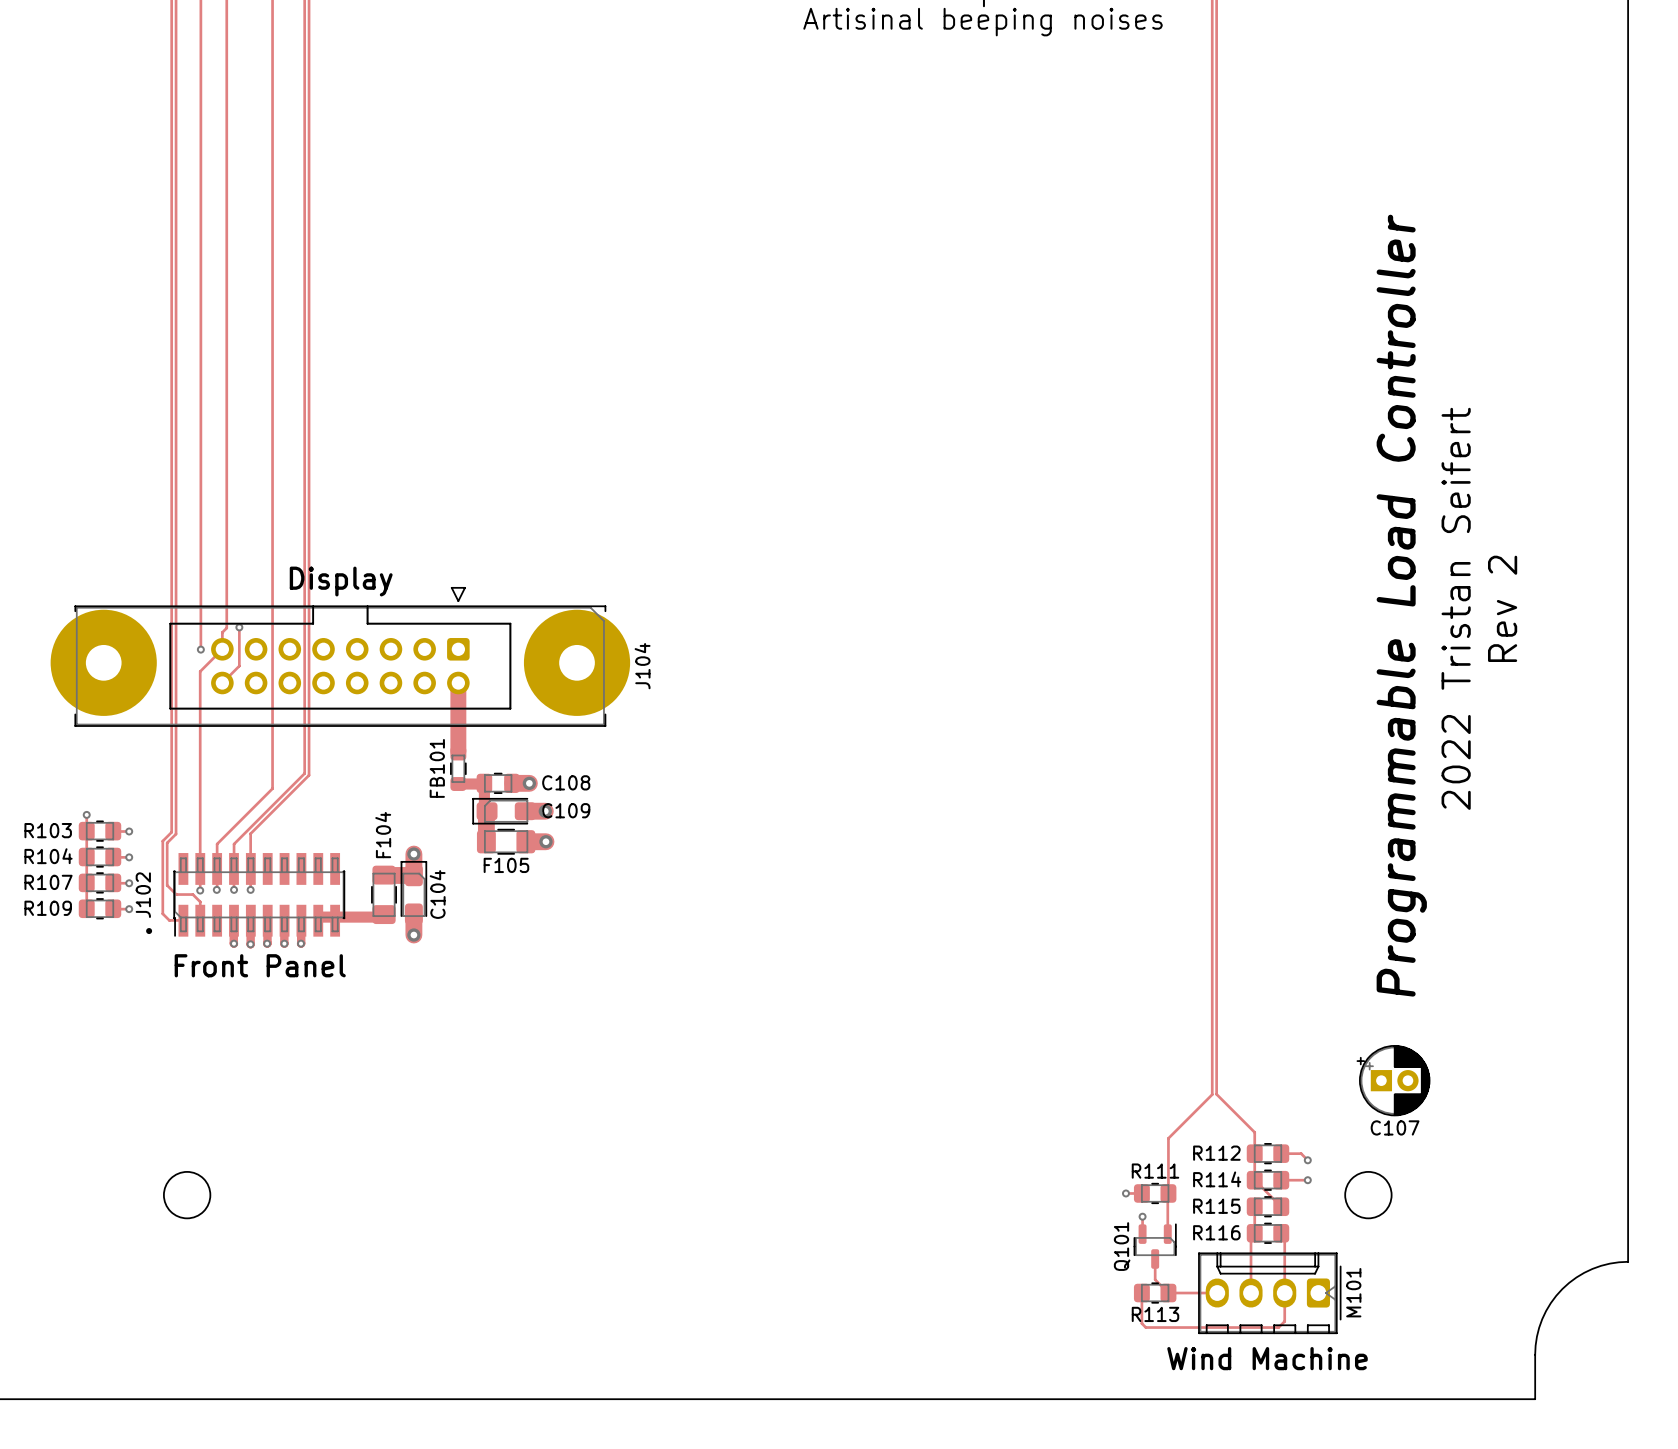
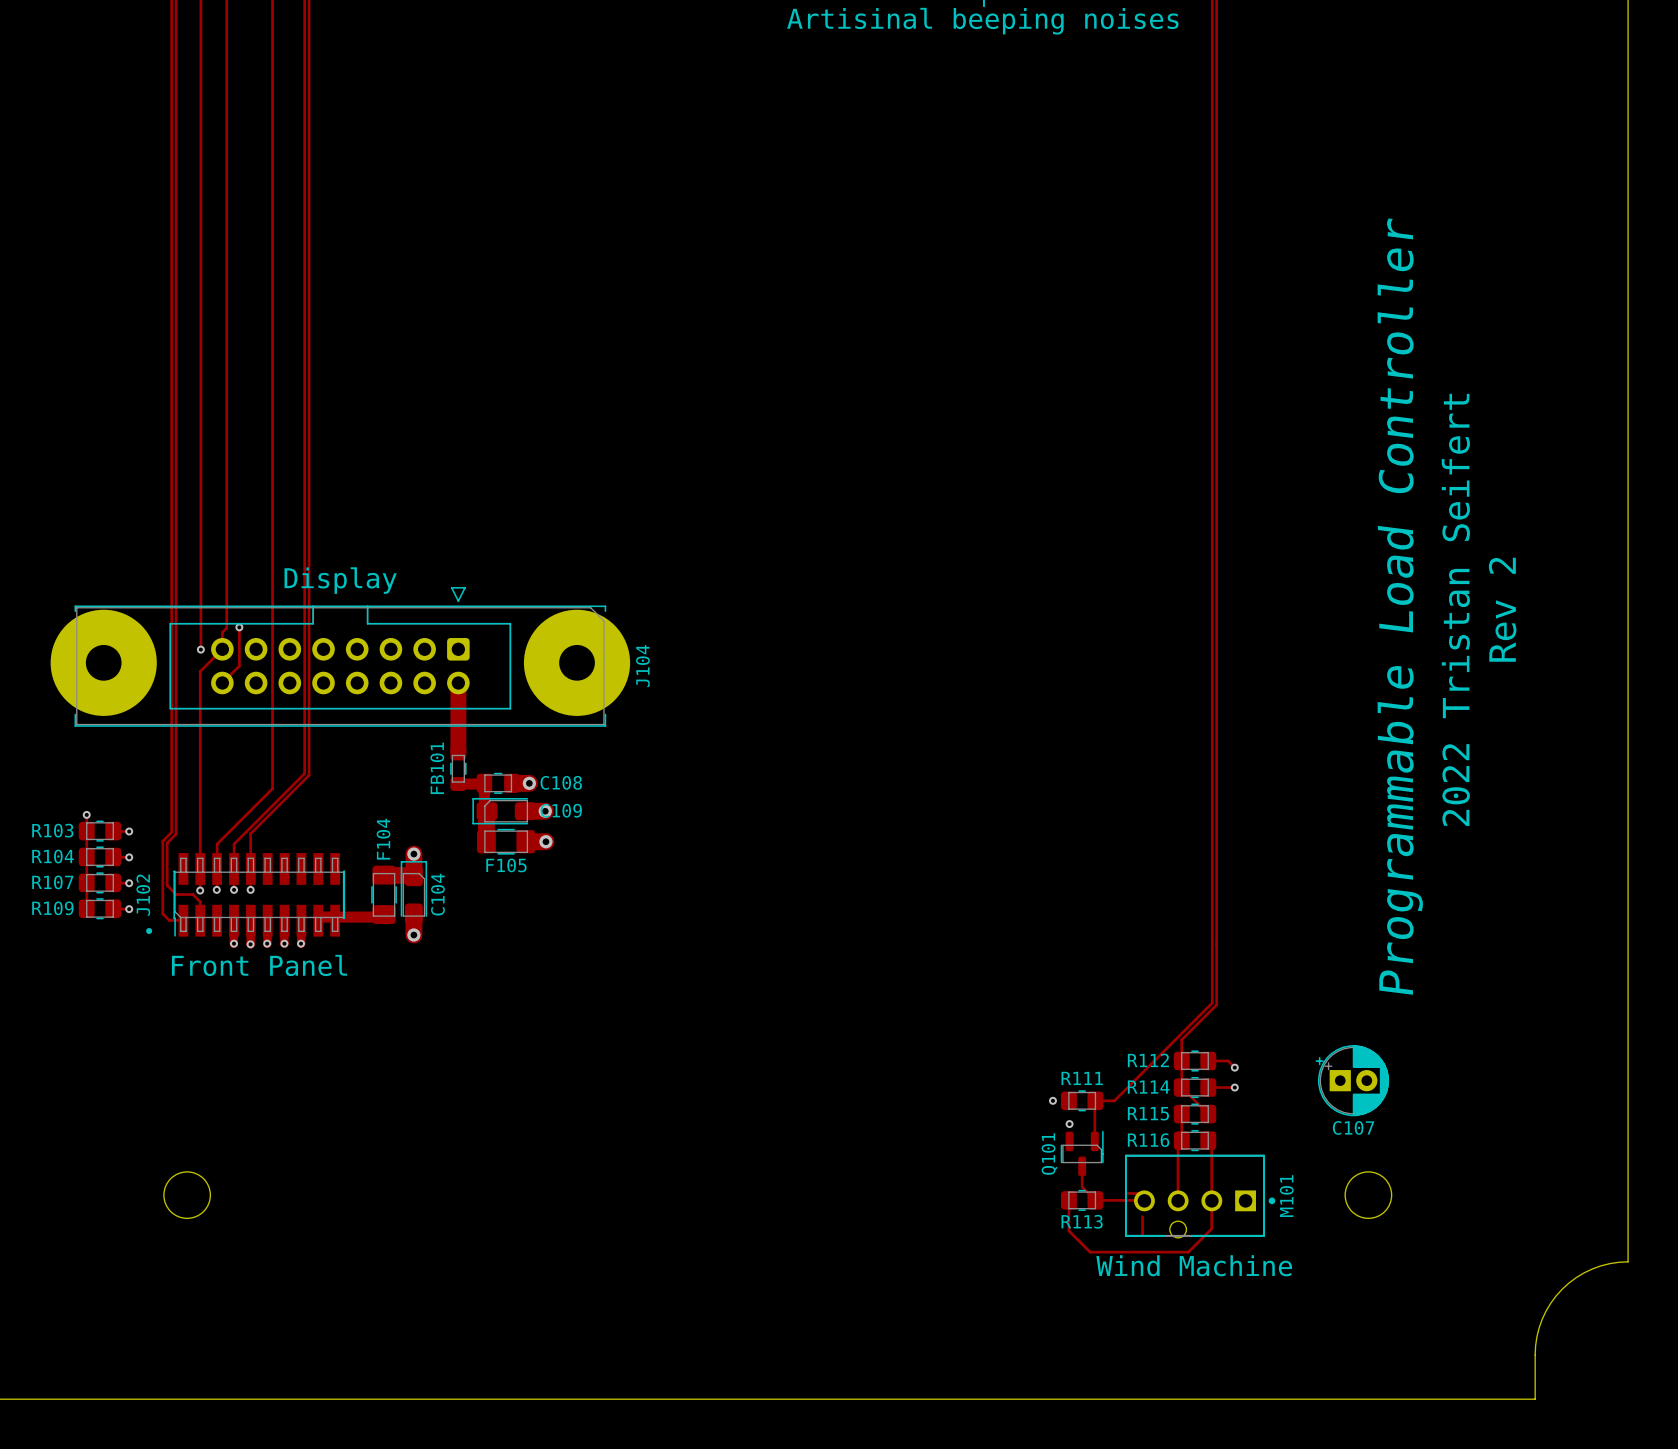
track: (1212, 1003) (1212, 1094) (1168, 1138) (1167, 1234) -> (1212, 1003) (1114, 1100) (1094, 1101) (1094, 1141)
track: (1216, 1004) (1216, 1094) (1254, 1132) (1254, 1180) (1281, 1206) -> (1216, 1004) (1181, 1039) (1181, 1087) (1208, 1114)
via: none -> (1234, 1067)
C107 position: (1393, 1080) -> (1352, 1080)
via: none -> (1234, 1087)
via: none -> (1052, 1100)
via: none -> (1069, 1124)
track: none -> (1208, 1140) (1211, 1144) (1211, 1228) (1188, 1252) (1090, 1252) (1068, 1230) (1068, 1200)
R112 position: (1267, 1153) -> (1194, 1061)
track: (1281, 1153) (1301, 1153) (1307, 1160) -> (1208, 1061) (1228, 1061) (1234, 1067)
via: (1307, 1160) -> none
R114 position: (1267, 1180) -> (1194, 1087)
track: (1281, 1180) (1307, 1180) -> (1208, 1087) (1234, 1087)
via: (1307, 1180) -> none
via: (1125, 1193) -> none
R111 position: (1155, 1193) -> (1082, 1100)
track: (1254, 1206) (1254, 1233) (1251, 1237) (1251, 1293) -> (1181, 1114) (1181, 1140) (1178, 1144) (1178, 1200)
R115 position: (1267, 1206) -> (1194, 1114)
via: (1142, 1216) -> none
R116 position: (1267, 1233) -> (1194, 1140)
track: (1281, 1233) (1284, 1236) (1284, 1321) (1278, 1327) (1145, 1327) (1141, 1323) (1141, 1293) -> none
Q101 position: (1155, 1246) -> (1082, 1153)
M101 footprint: [1198, 1252, 1342, 1335] -> [1124, 1154, 1276, 1238]
track: (1155, 1259) (1155, 1279) (1168, 1293) (1210, 1293) -> (1082, 1166) (1082, 1187) (1095, 1200) (1137, 1200)
R113 position: (1155, 1293) -> (1082, 1200)
text position: Wind Machine (1267, 1358) -> Wind Machine (1194, 1265)

